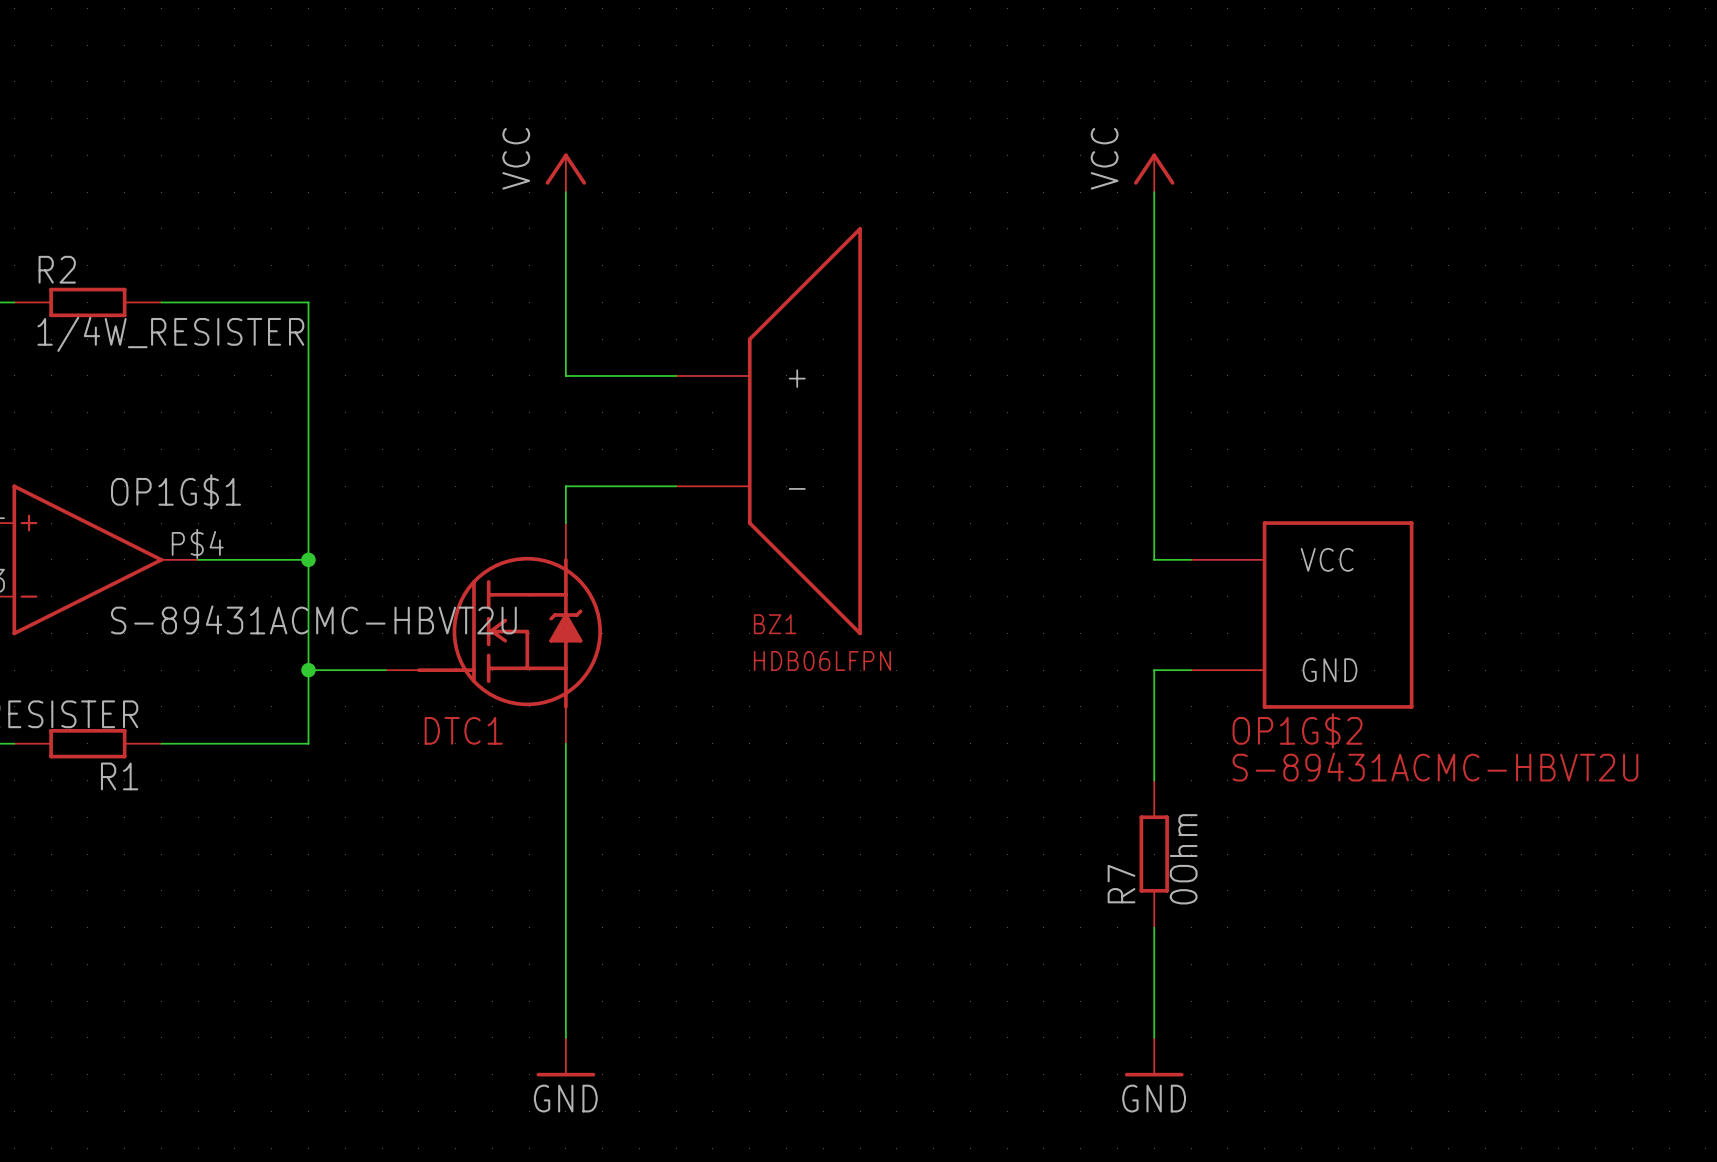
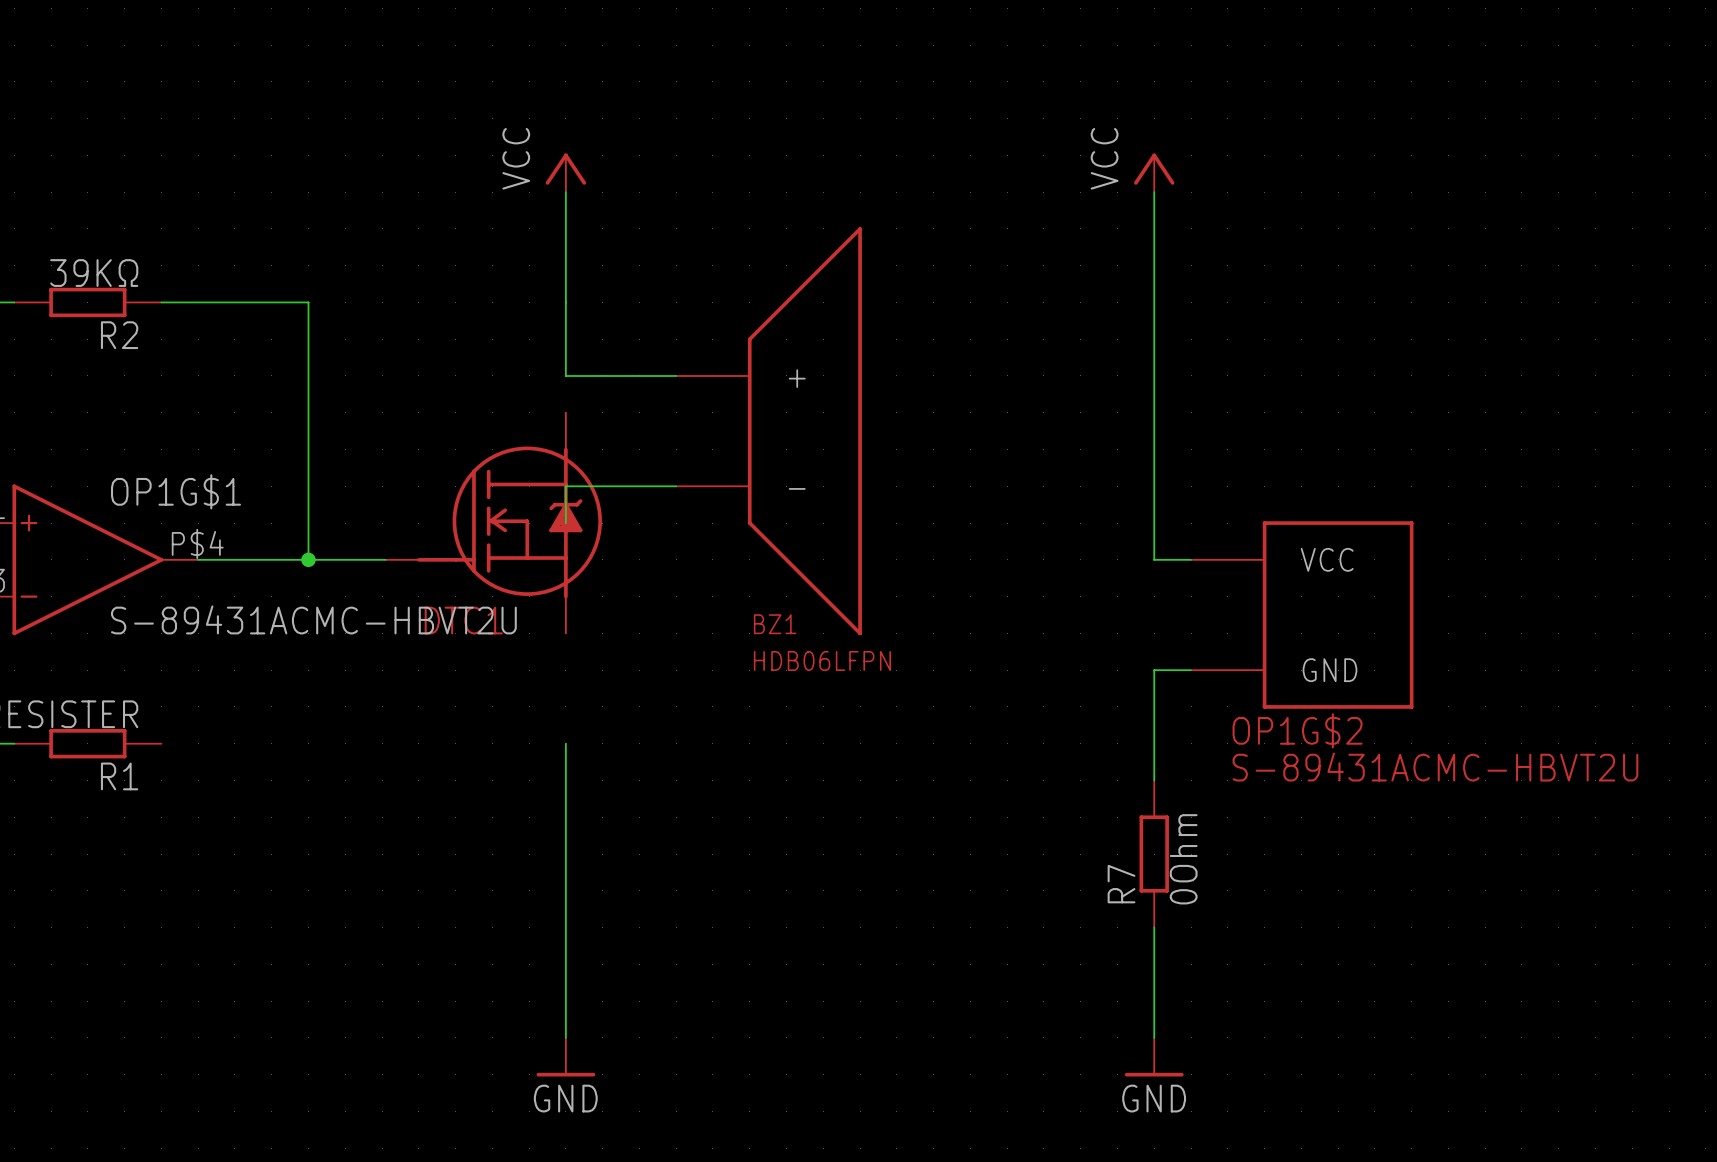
R2 name position: R2 (57, 269) -> R2 (119, 335)
R2 value: 1/4W_RESISTER (170, 334) -> 39KΩ (94, 273)
wire: (308, 559) (308, 743) (161, 743) -> (308, 559) (385, 559)
DTC1 position: (493, 633) -> (493, 523)
wire: (308, 670) (385, 670) -> none
junction: (308, 670) -> none

